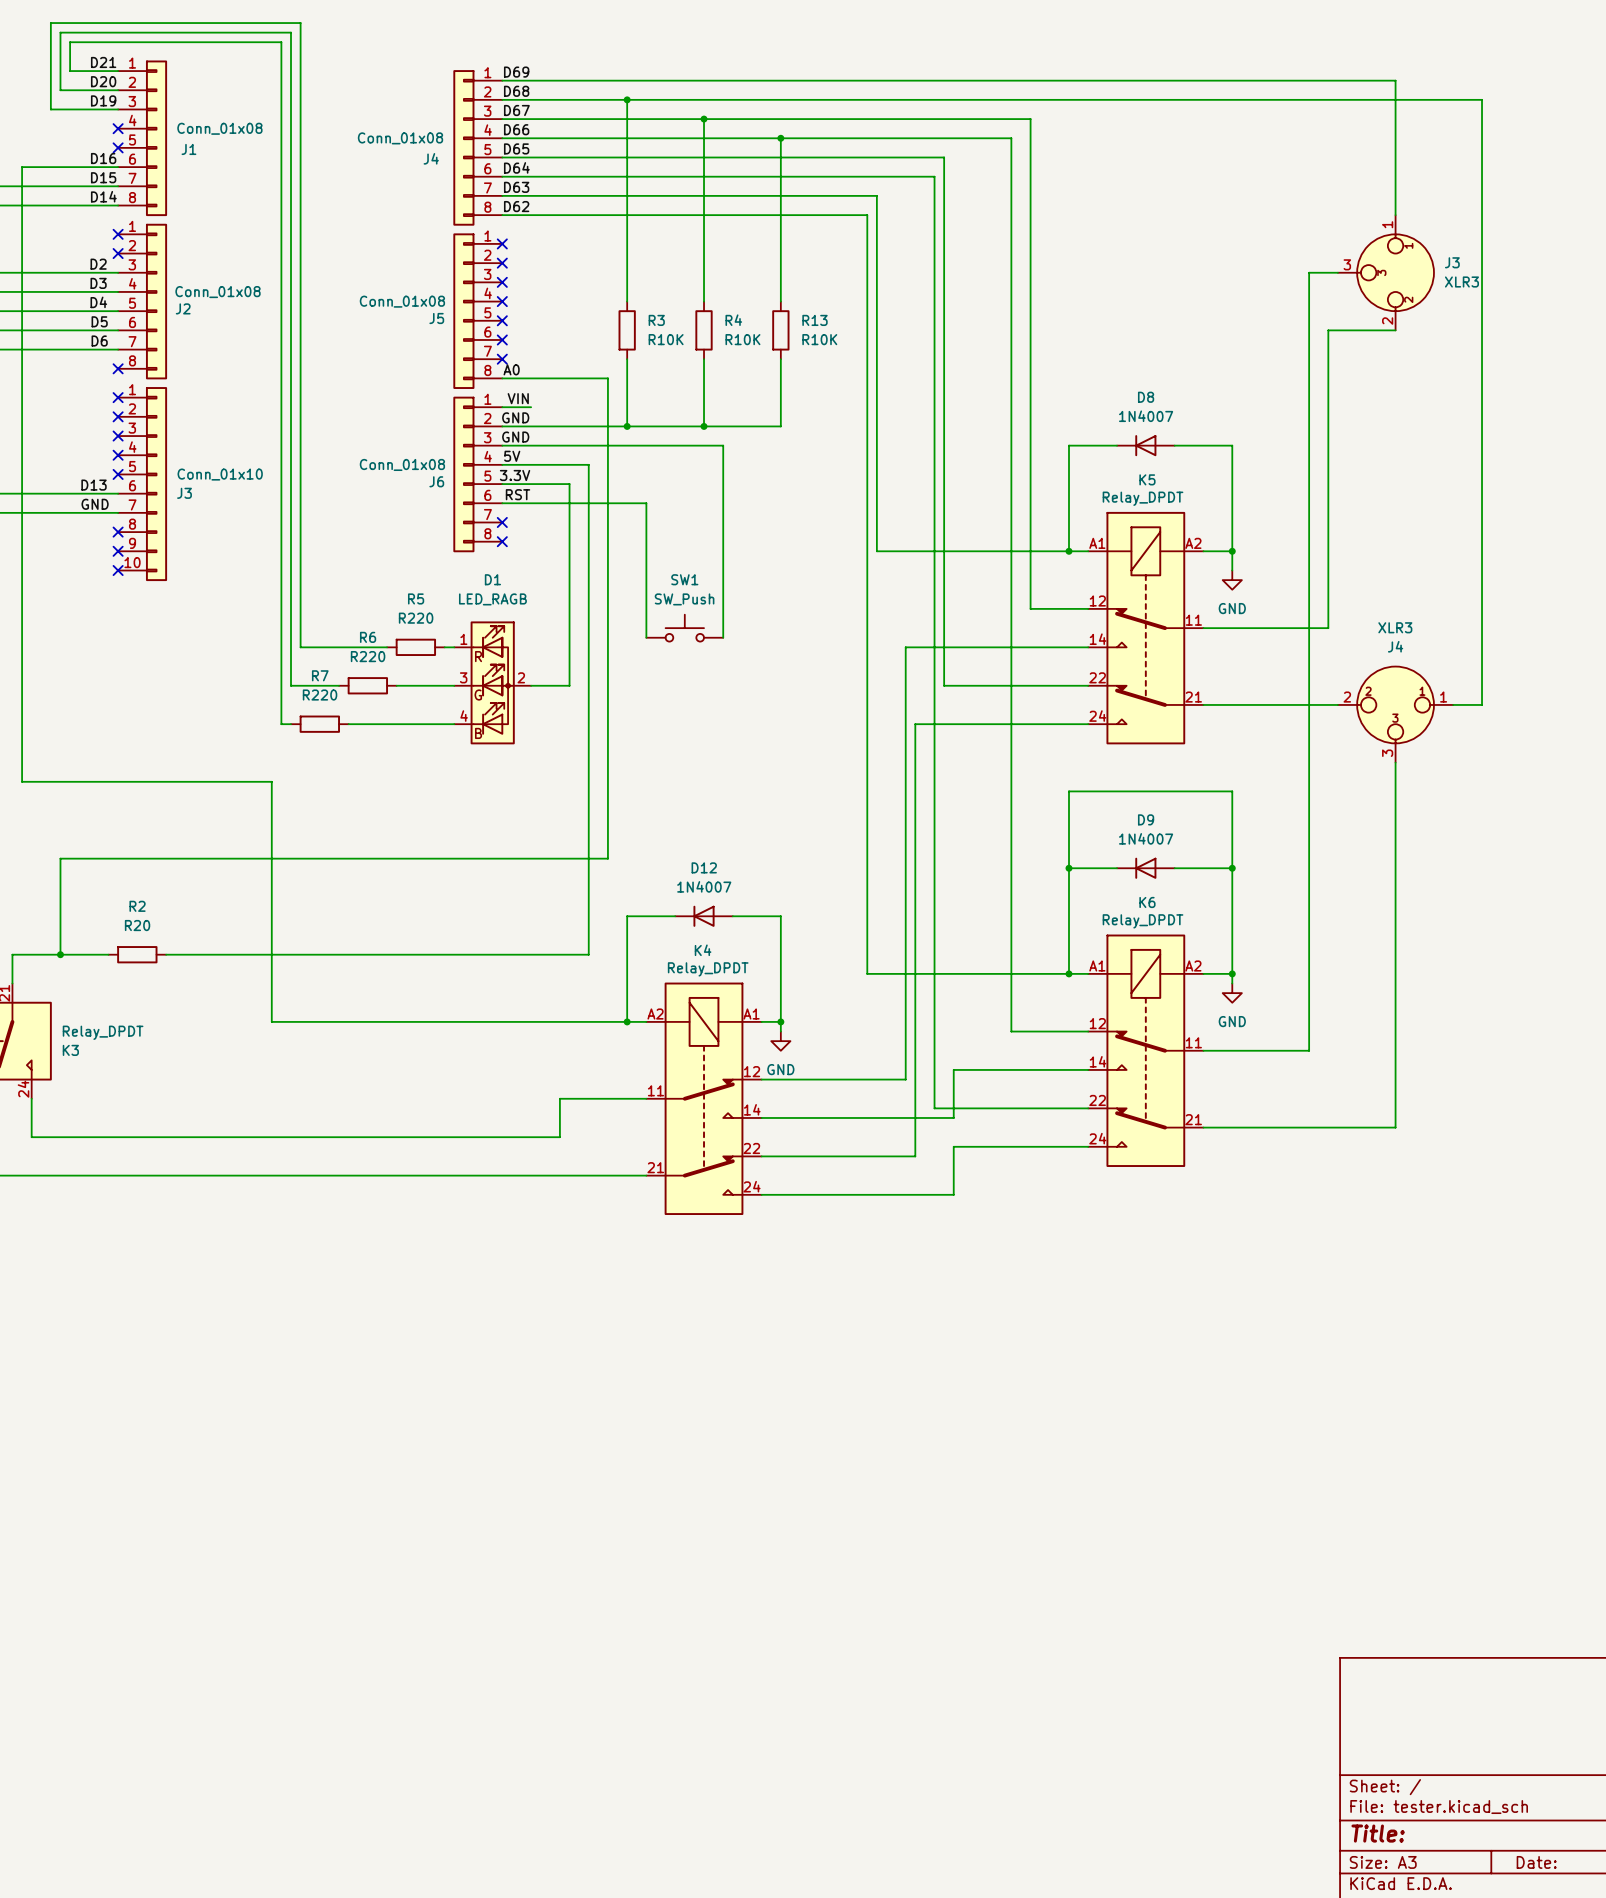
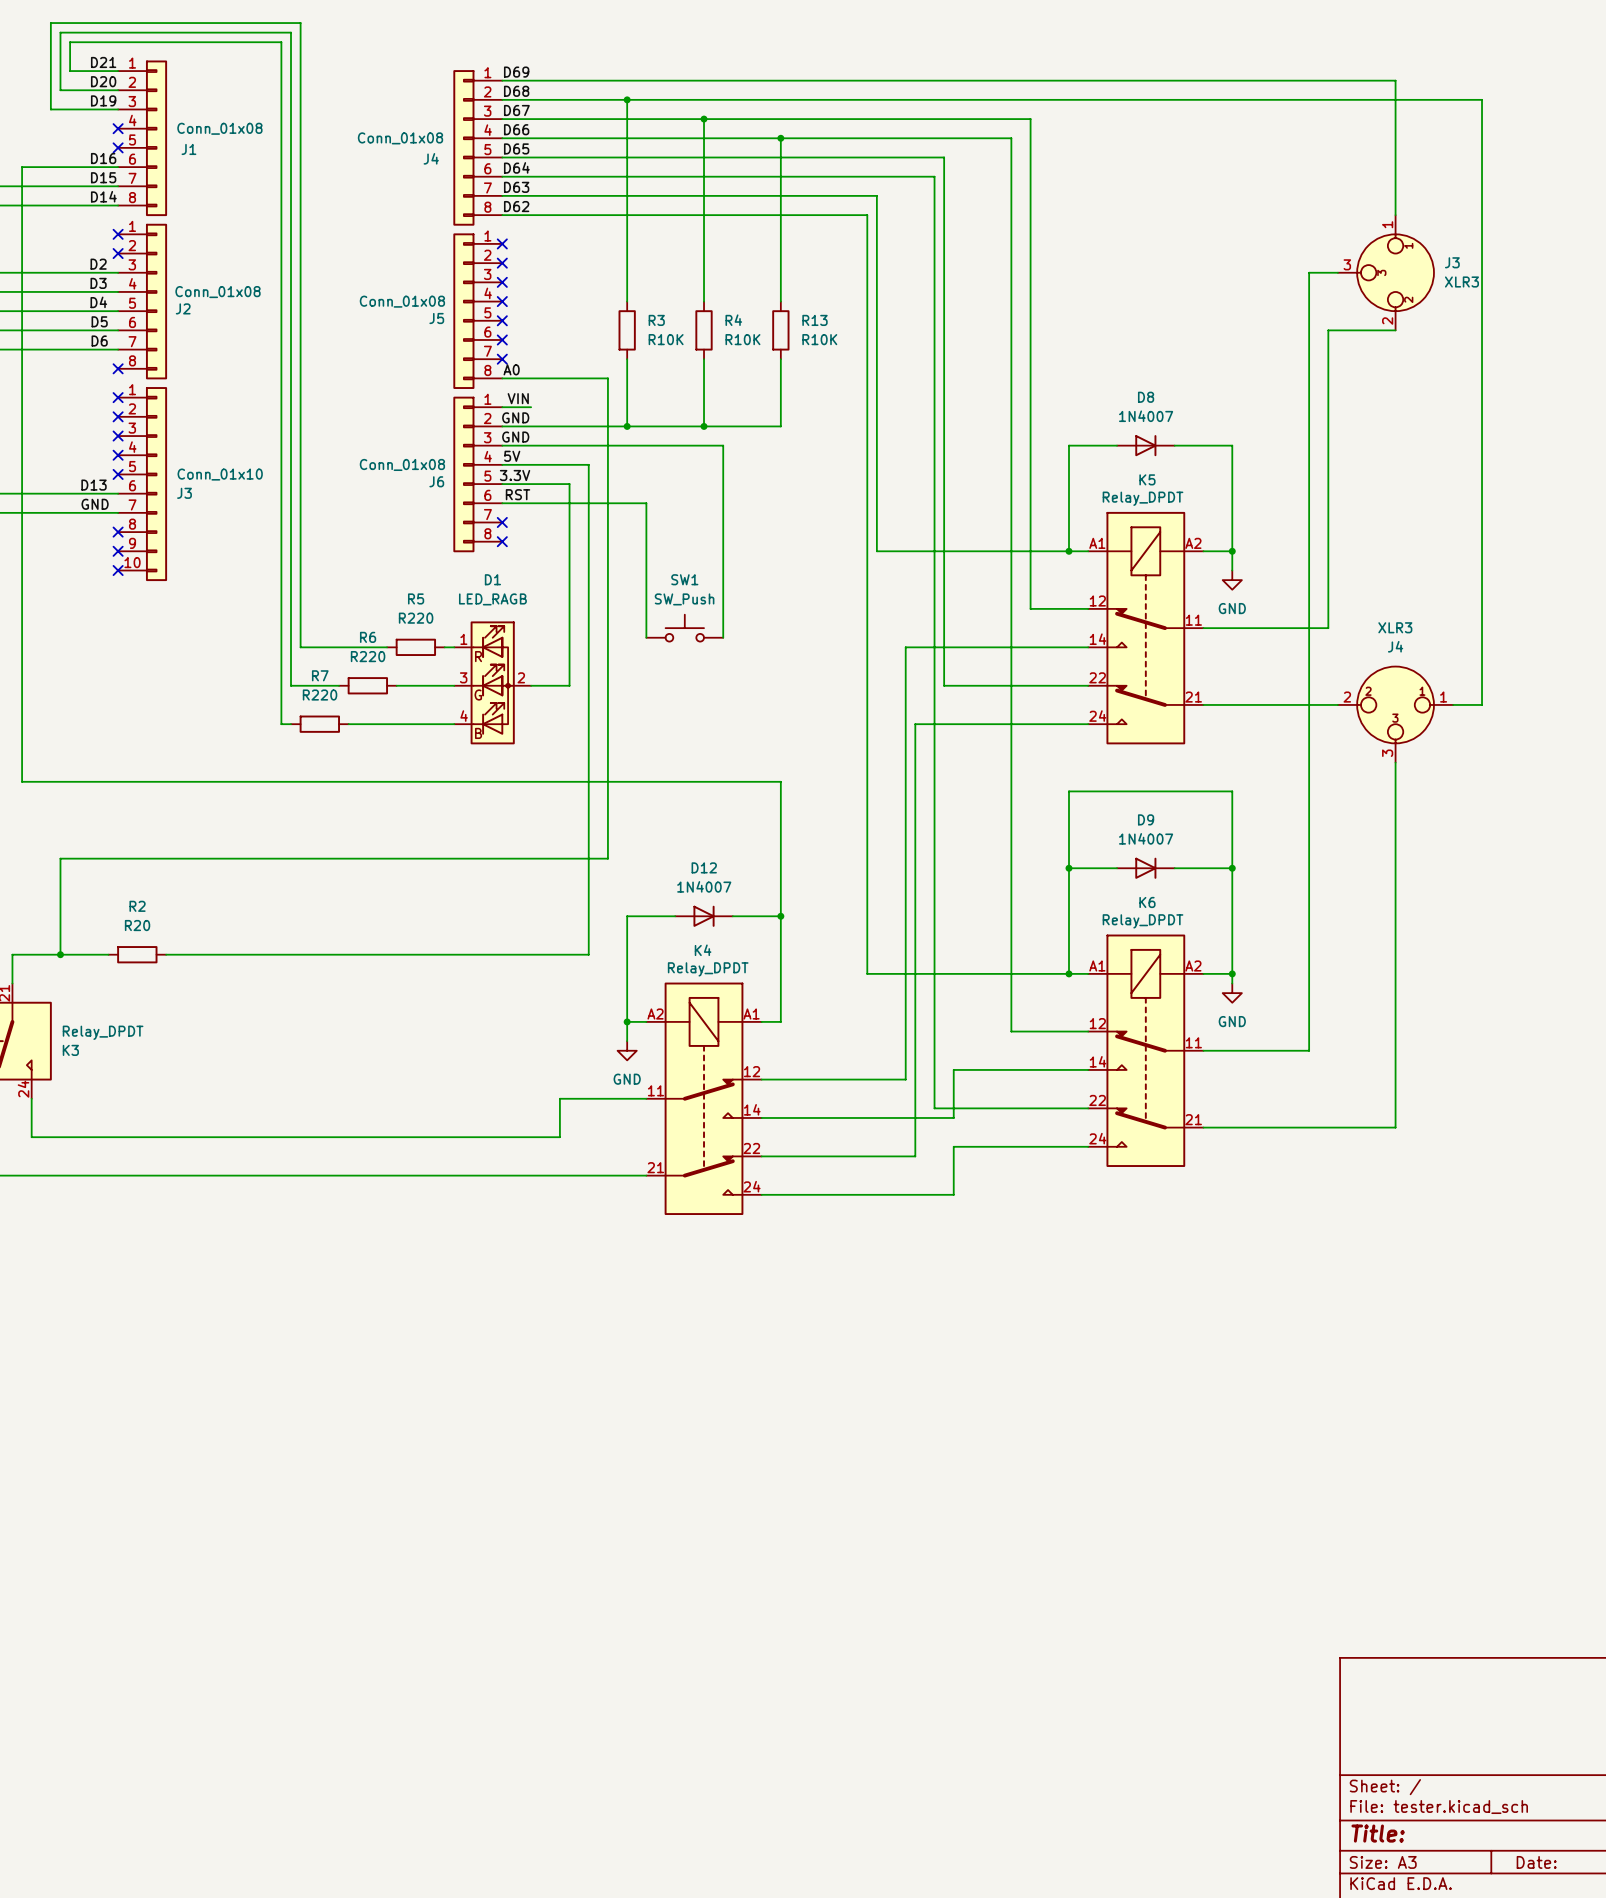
D8 rotation: 0° (1145, 445) -> 180° (1145, 445)
wire: (271, 781) (271, 1021) (627, 1021) -> (271, 781) (780, 781) (780, 916)
D9 rotation: 0° (1145, 868) -> 180° (1145, 868)
D12 rotation: 0° (704, 916) -> 180° (704, 916)
junction: none -> (780, 916)
wire: none -> (627, 1021) (627, 1041)
wire: (780, 1021) (780, 1031) -> none
junction: (780, 1021) -> none
power symbol position: GND (780, 1041) -> GND (627, 1050)

